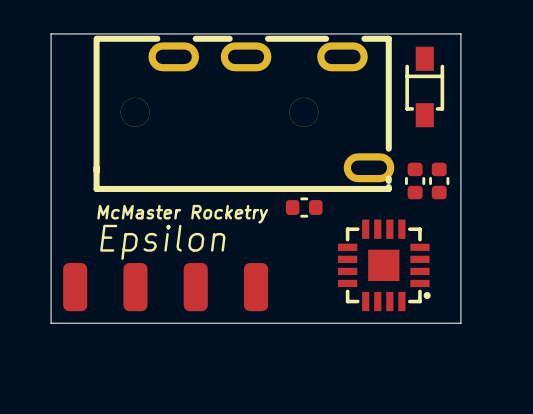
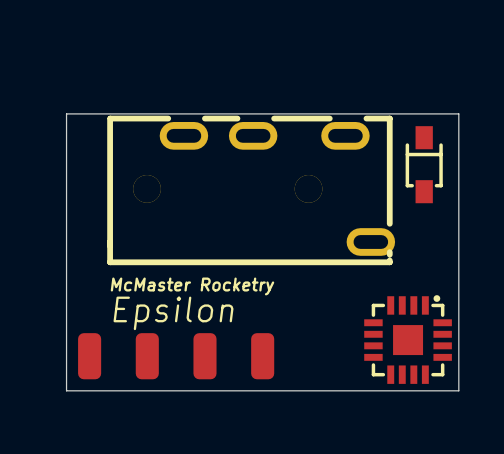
part: (415, 181) -> none
part: (439, 181) -> none
part: (304, 207) -> none
part rotation: 0° (384, 265) -> 90° counterclockwise (408, 339)

